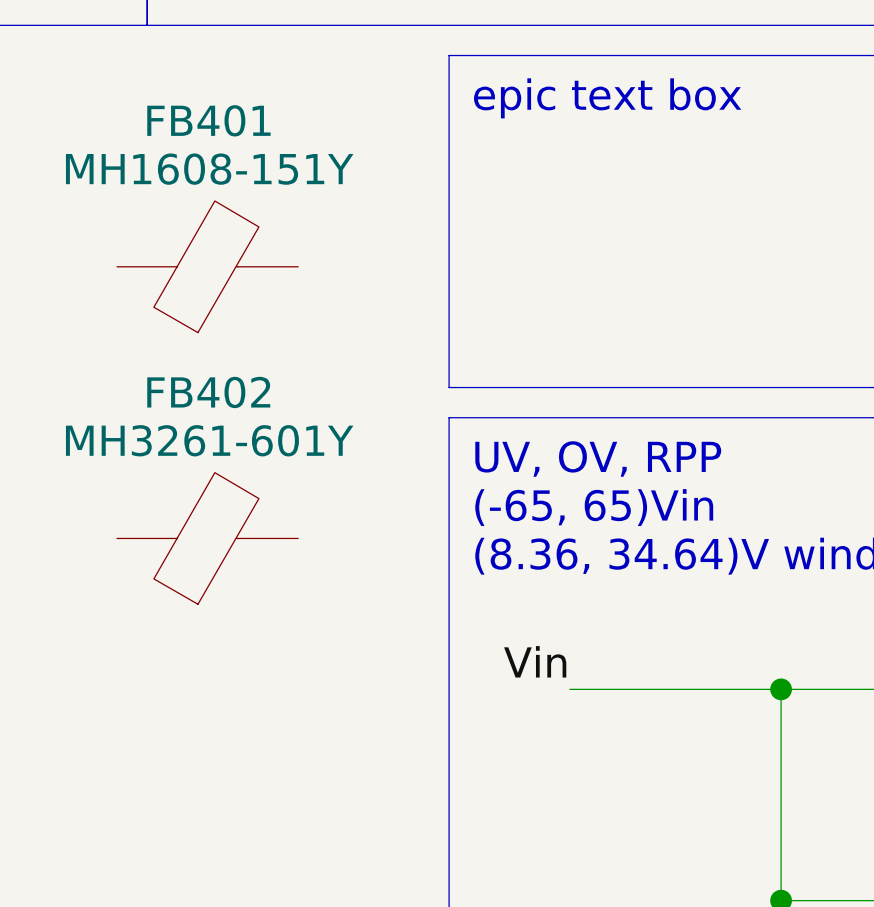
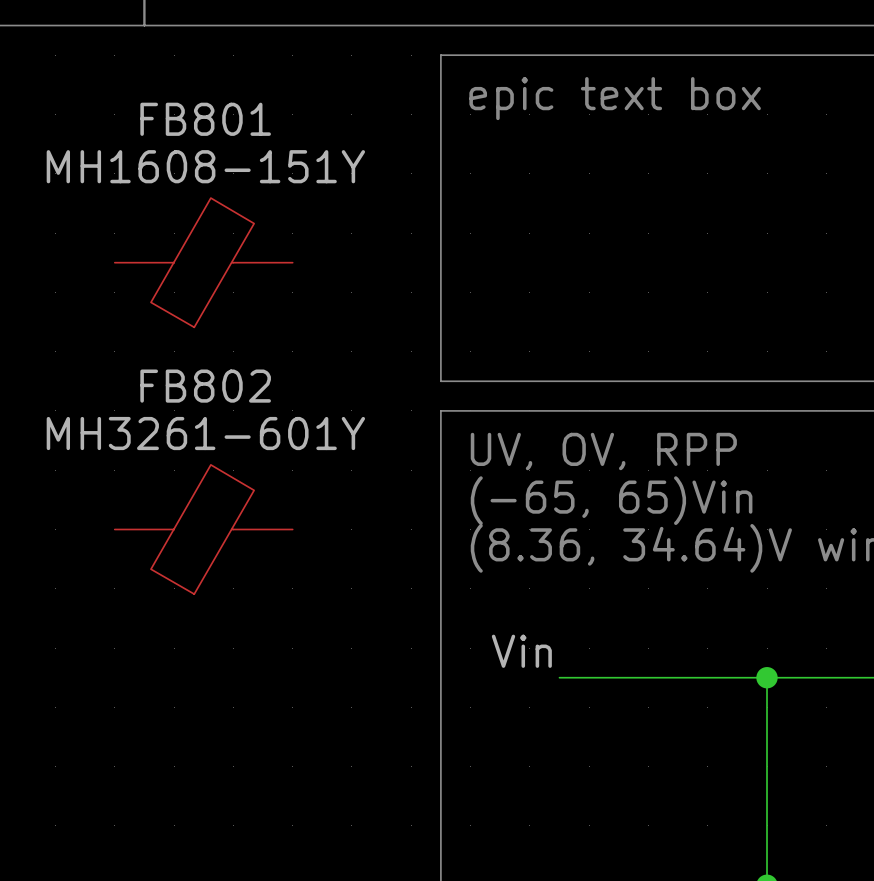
FB401 name: FB401 (208, 120) -> FB801 (205, 119)
FB402 name: FB402 (208, 392) -> FB802 (205, 386)

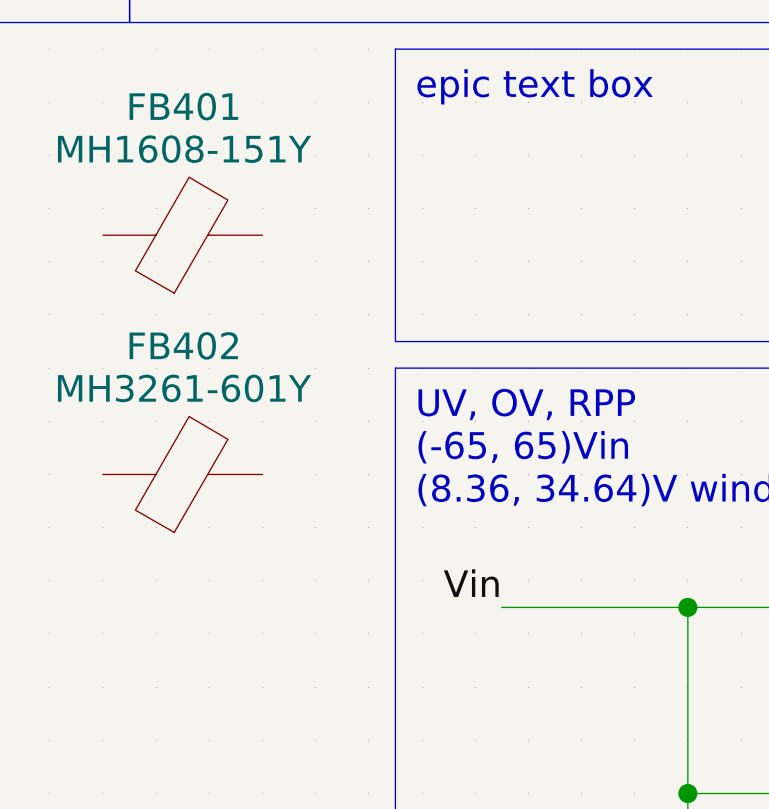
FB801 name: FB801 (205, 119) -> FB401 (183, 106)
FB802 name: FB802 (205, 386) -> FB402 (183, 345)

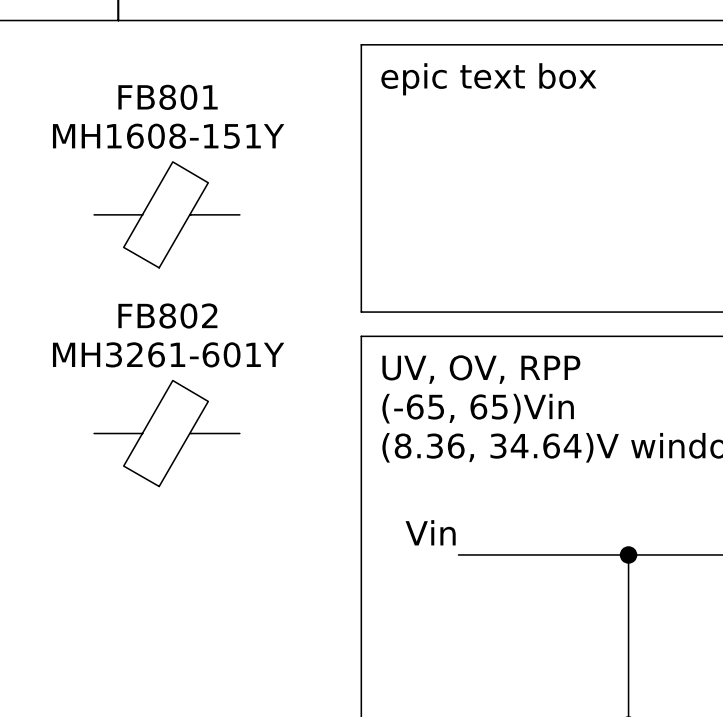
FB401 name: FB401 (183, 106) -> FB801 (168, 97)
FB402 name: FB402 (183, 345) -> FB802 (167, 316)

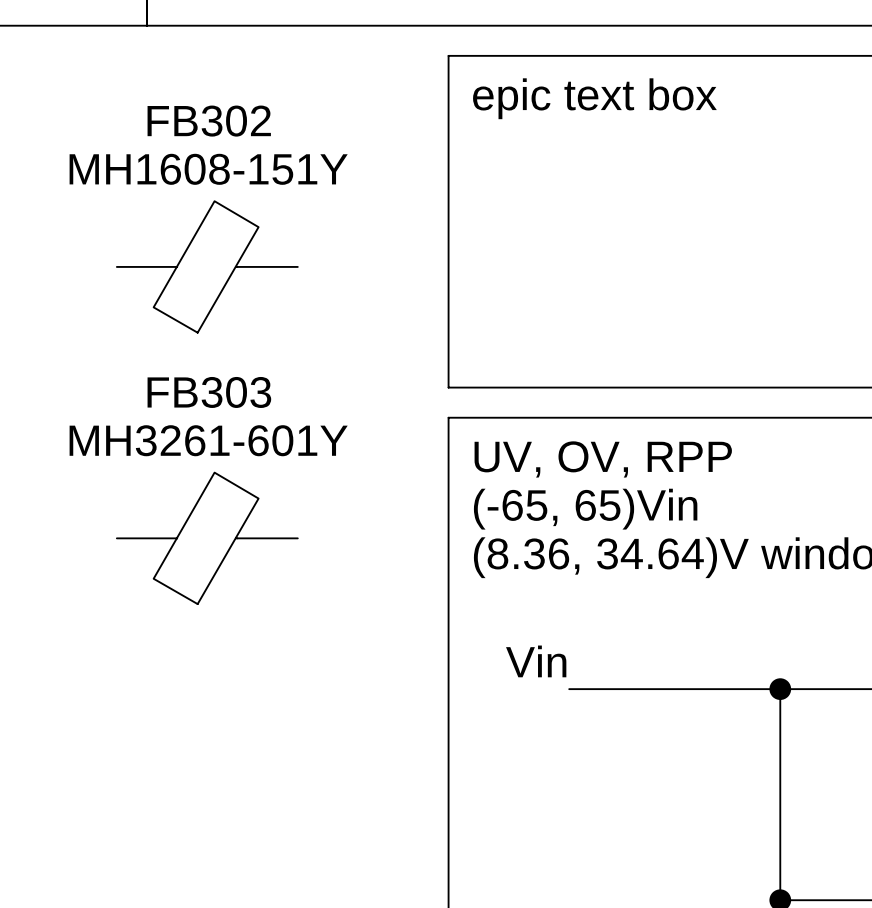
FB801 name: FB801 (168, 97) -> FB302 (209, 121)
FB802 name: FB802 (167, 316) -> FB303 (209, 392)

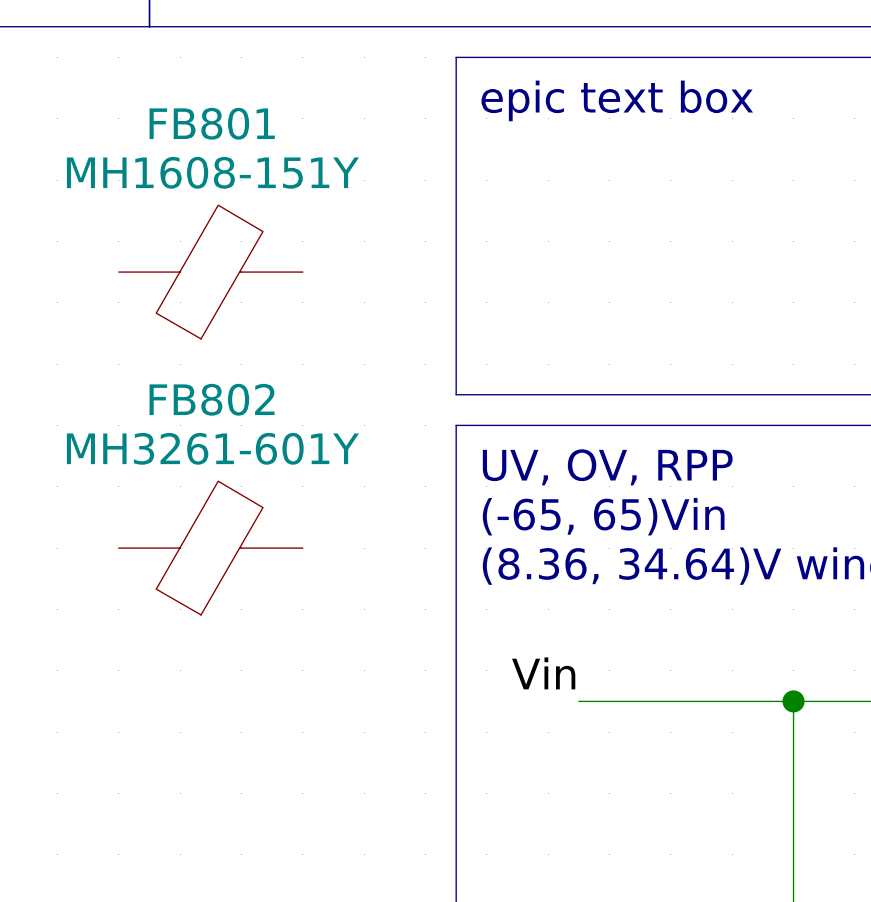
FB302 name: FB302 (209, 121) -> FB801 (212, 123)
FB303 name: FB303 (209, 392) -> FB802 (212, 399)

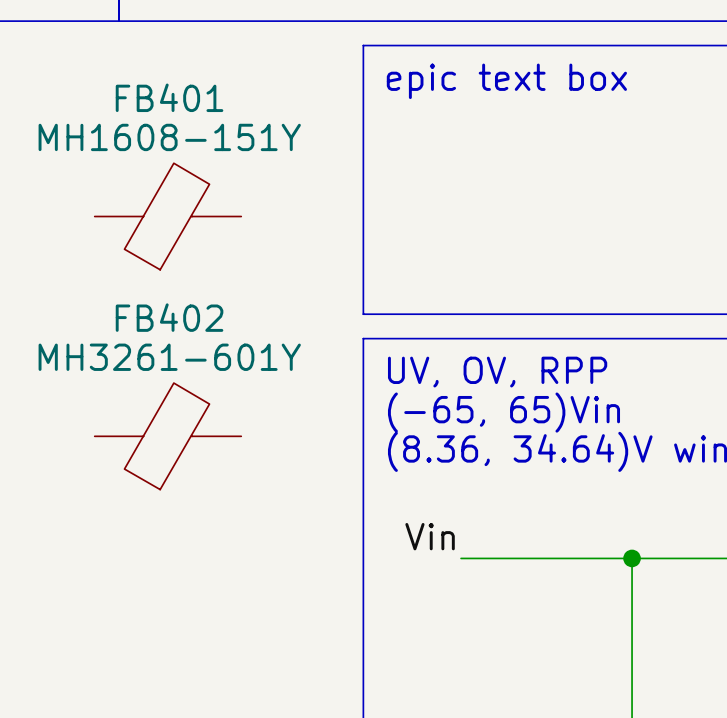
FB801 name: FB801 (212, 123) -> FB401 (169, 97)
FB802 name: FB802 (212, 399) -> FB402 (169, 317)

